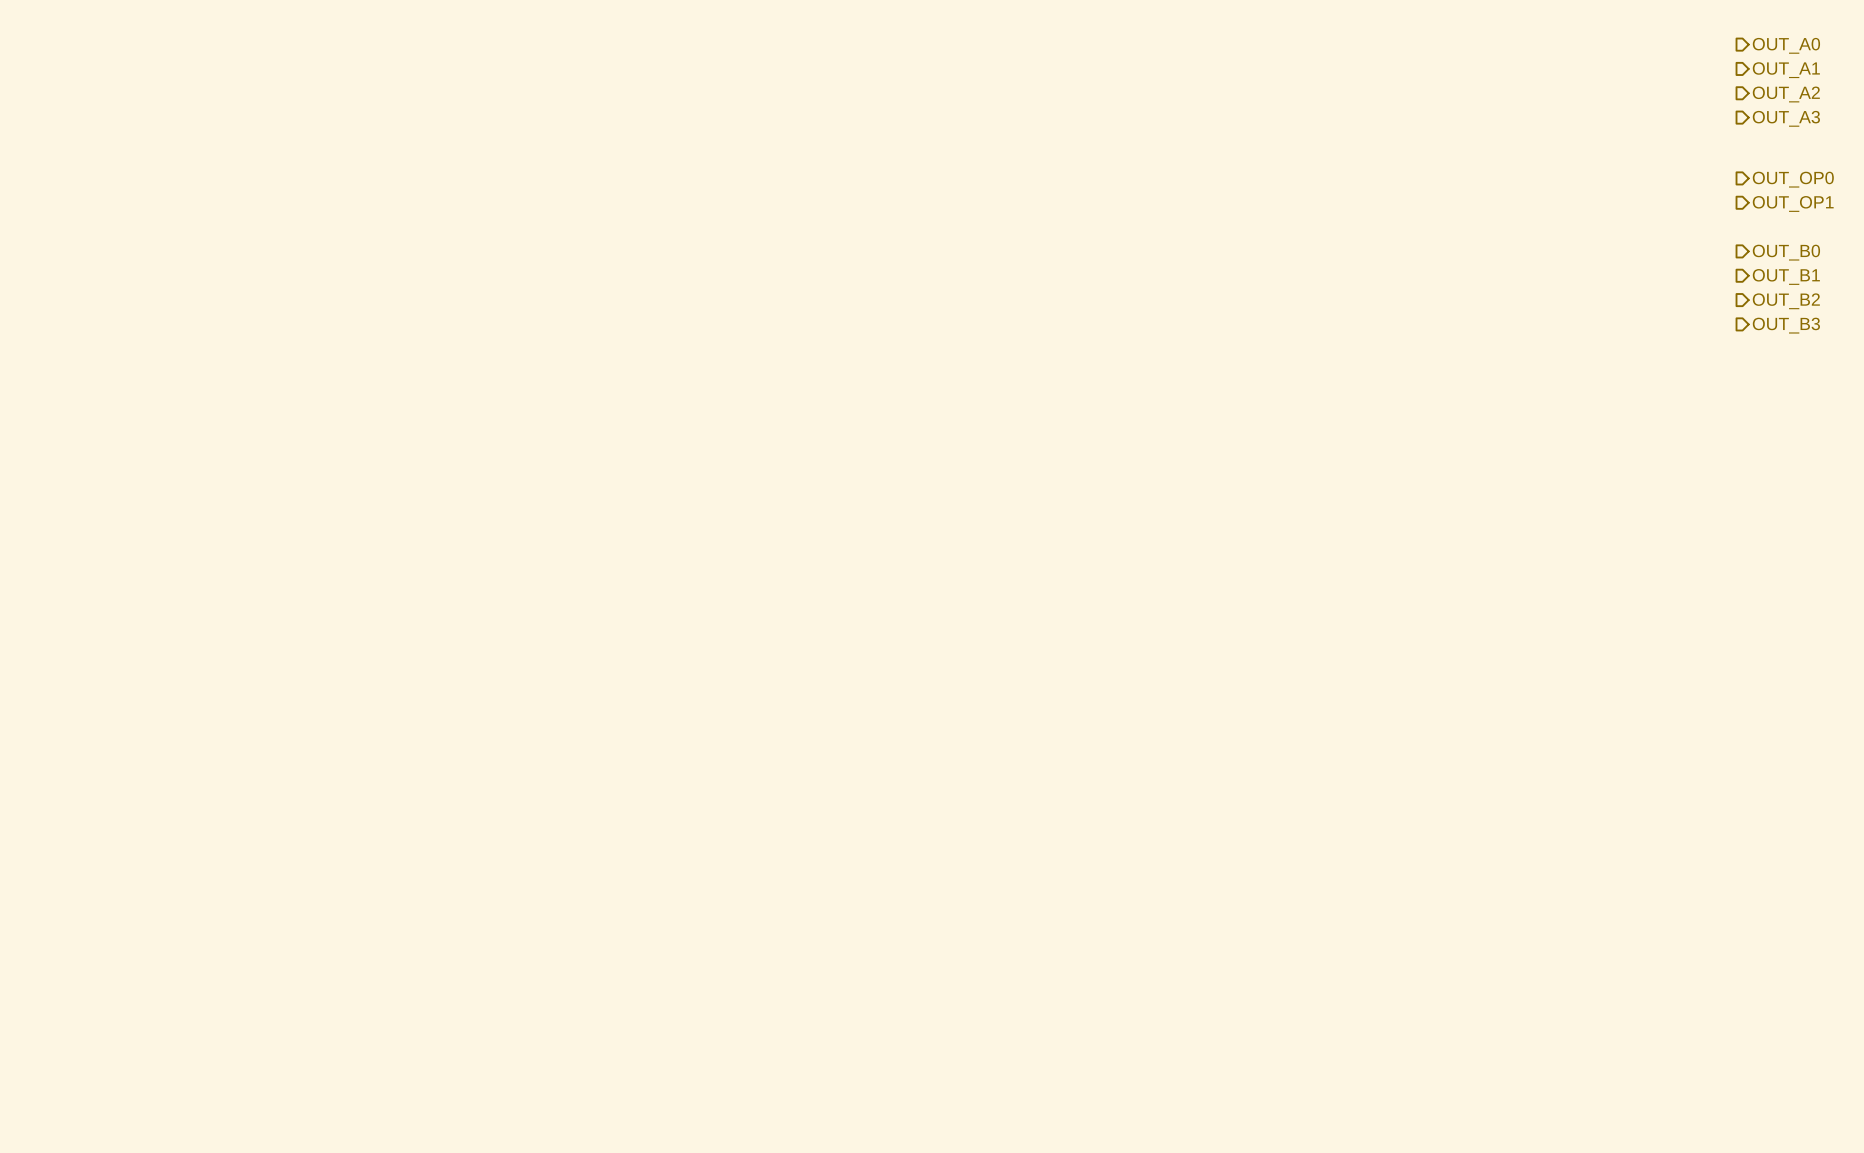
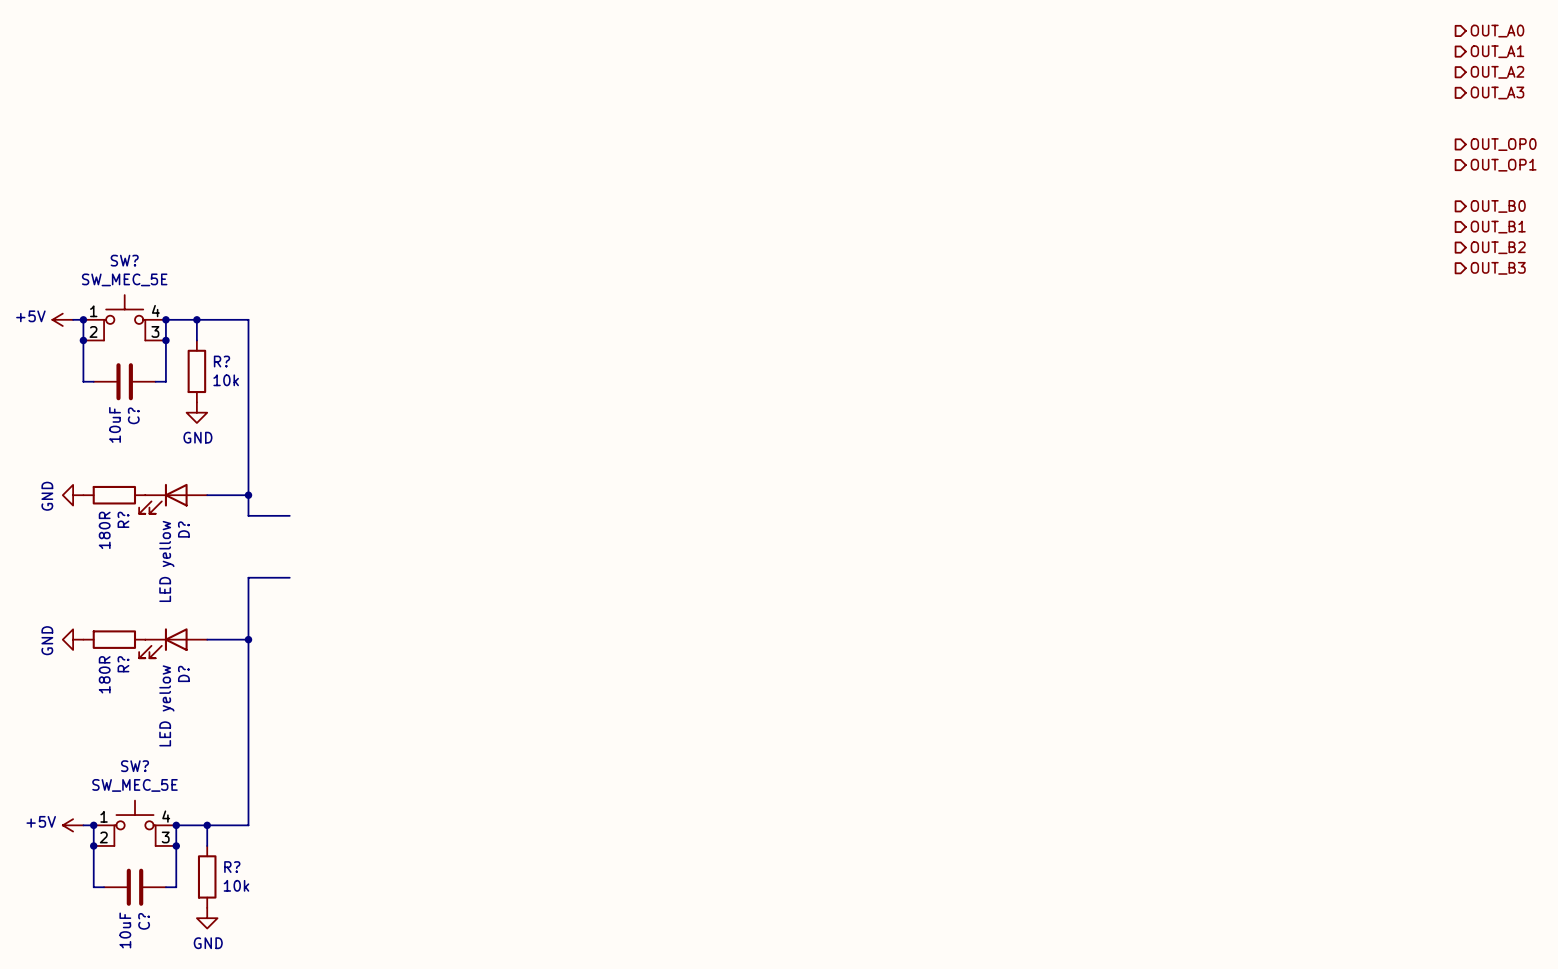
SW?: none -> SW_MEC_5E (124, 317)
power symbol: none -> +5V (62, 319)
wire: none -> (73, 319) (83, 319) (83, 381) (93, 381)
junction: none -> (83, 319)
junction: none -> (165, 319)
wire: none -> (196, 319) (196, 340)
junction: none -> (196, 319)
junction: none -> (83, 340)
junction: none -> (165, 340)
R?: none -> 10k (196, 371)
C?: none -> 10uF (124, 381)
wire: none -> (155, 381) (165, 381) (165, 319) (248, 319) (248, 515) (289, 515)
power symbol: none -> GND (196, 412)
power symbol: none -> GND (73, 495)
R?: none -> 180R (114, 495)
wire: none -> (207, 495) (248, 495)
junction: none -> (248, 495)
D?: none -> LED yellow (173, 498)
wire: none -> (289, 577) (248, 577) (248, 825) (176, 825) (176, 887) (165, 887)
power symbol: none -> GND (73, 639)
R?: none -> 180R (114, 639)
wire: none -> (207, 639) (248, 639)
junction: none -> (248, 639)
D?: none -> LED yellow (173, 643)
SW?: none -> SW_MEC_5E (135, 823)
power symbol: none -> +5V (73, 825)
wire: none -> (83, 825) (93, 825) (93, 887) (104, 887)
junction: none -> (93, 825)
junction: none -> (176, 825)
wire: none -> (207, 825) (207, 845)
junction: none -> (207, 825)
junction: none -> (93, 845)
junction: none -> (176, 845)
R?: none -> 10k (207, 876)
C?: none -> 10uF (135, 887)
power symbol: none -> GND (207, 918)

